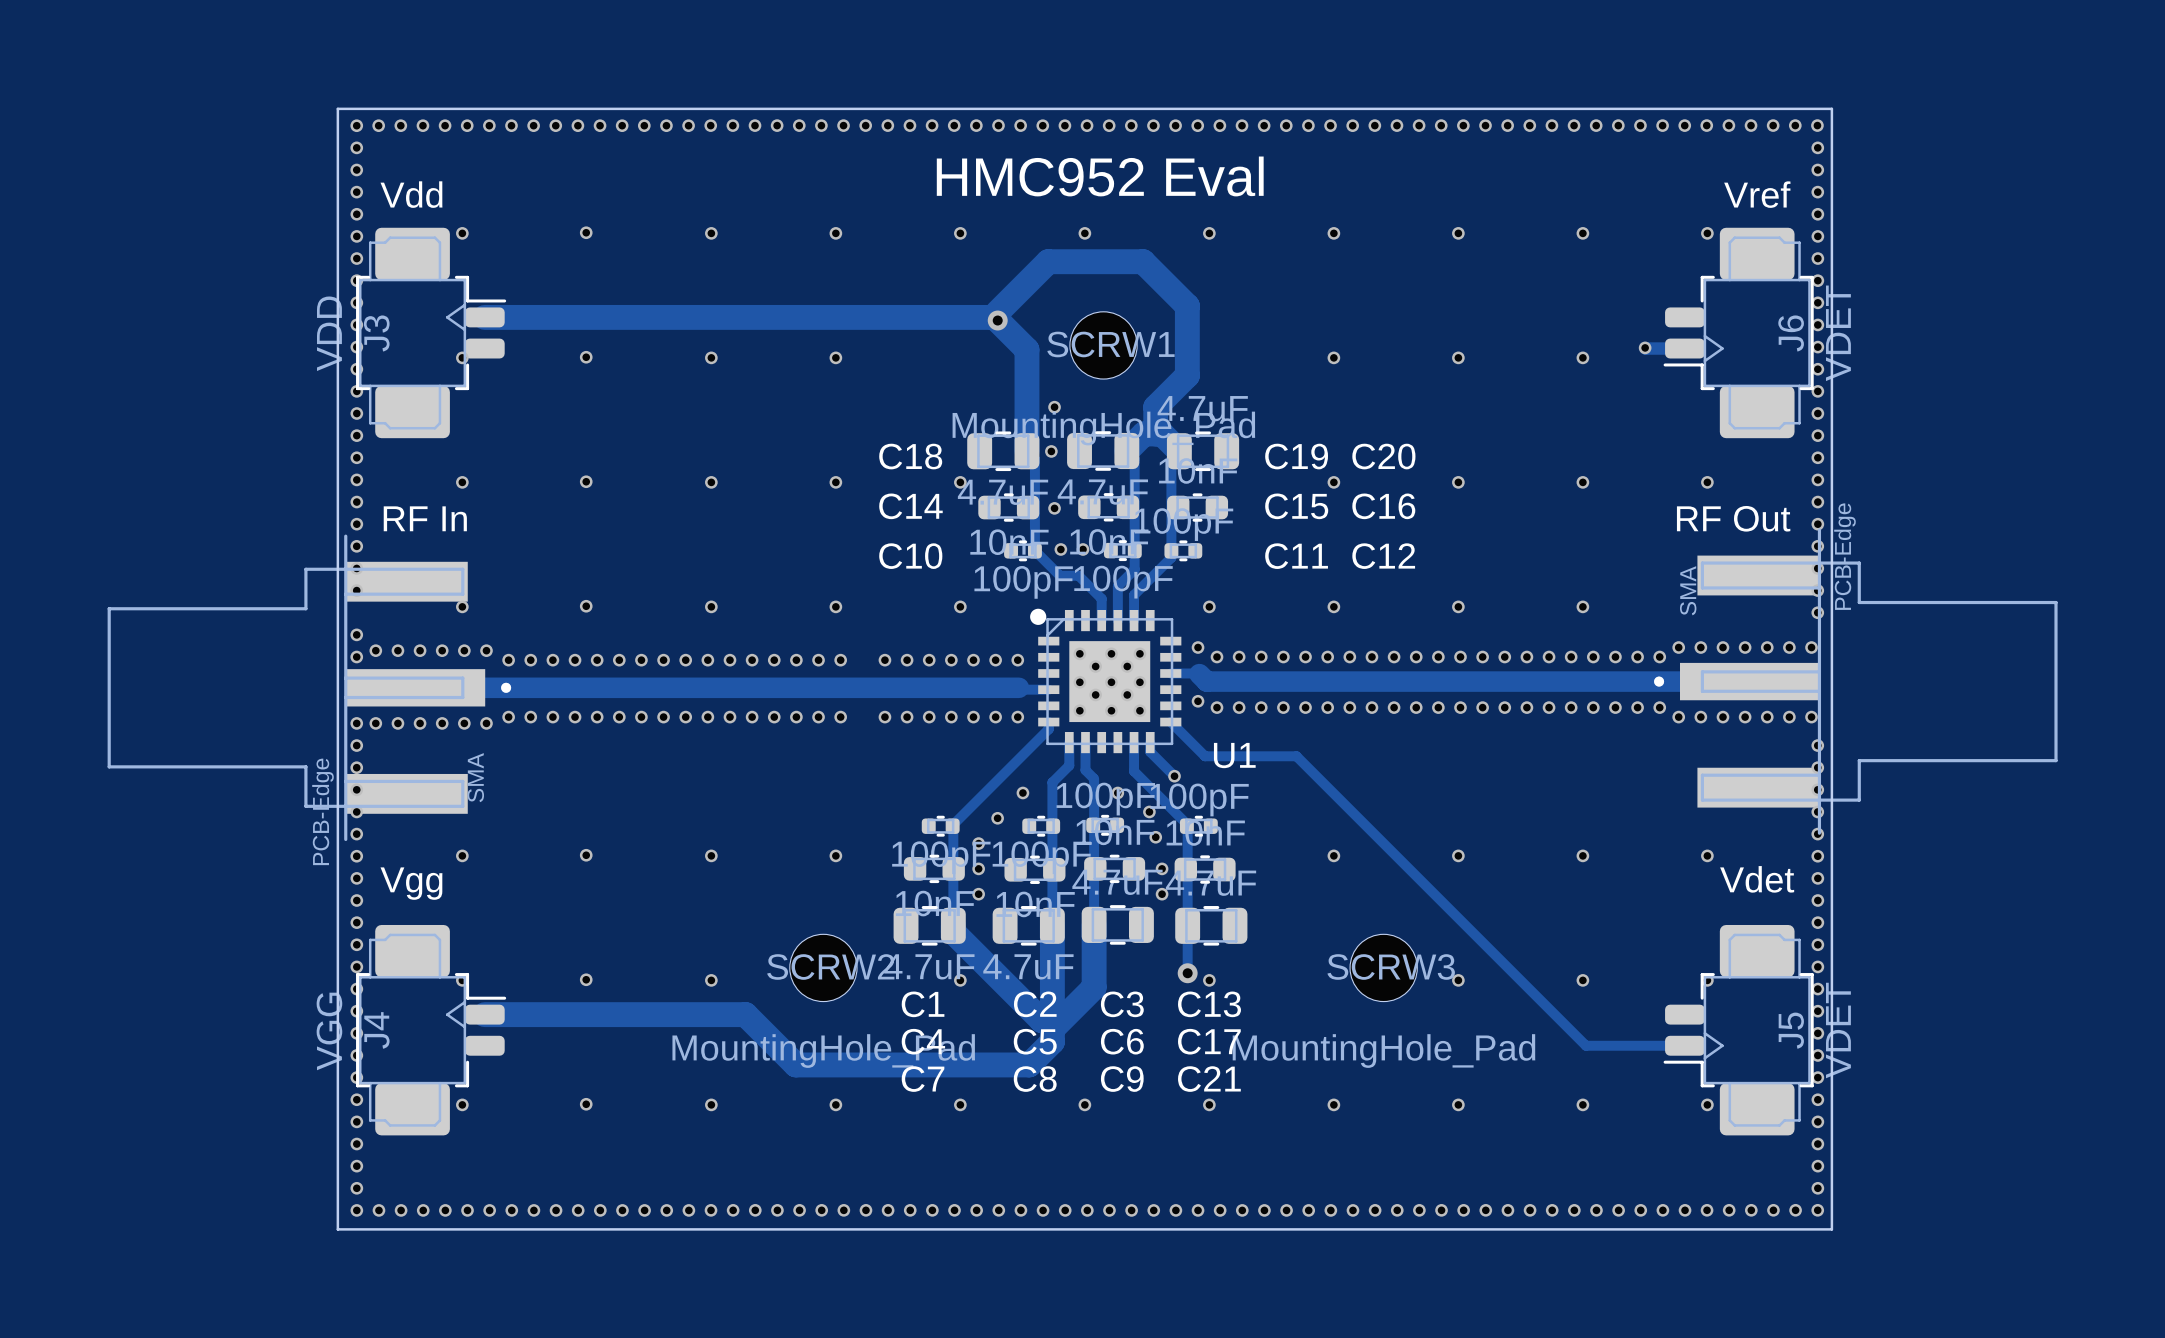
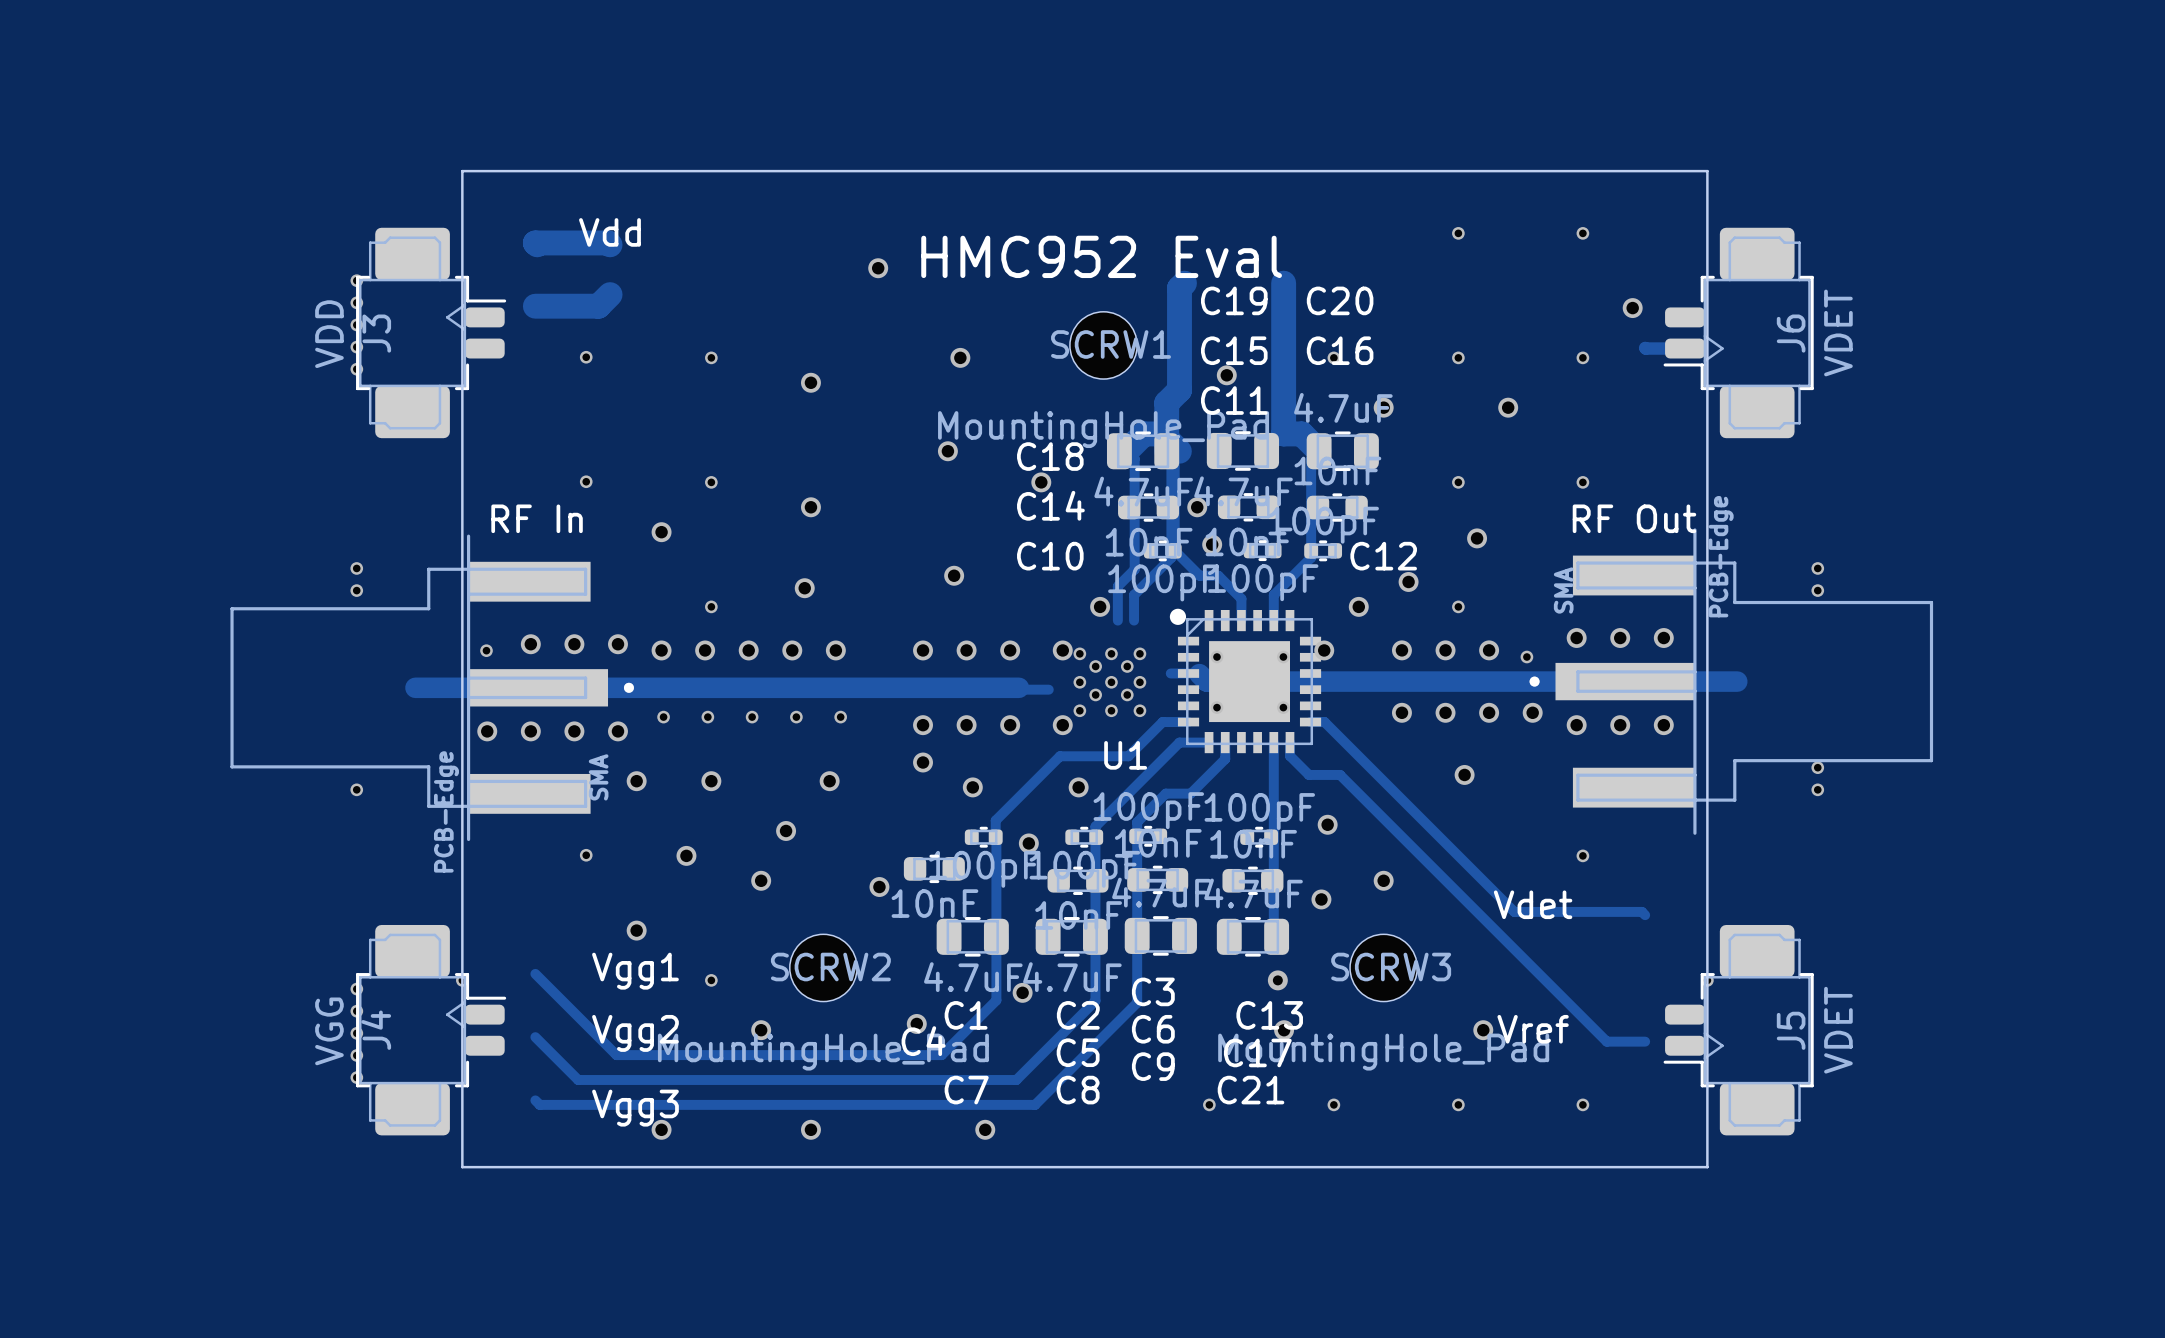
board edge: (337, 108) (1831, 108) (1831, 1229) (337, 1229) (337, 108) -> (462, 171) (462, 1167) (1707, 1167) (1707, 171) (462, 171)
via: (356, 125) -> none
via: (378, 125) -> none
via: (400, 125) -> none
via: (422, 125) -> none
via: (445, 125) -> none
via: (467, 125) -> none
via: (489, 125) -> none
via: (511, 125) -> none
via: (533, 125) -> none
via: (555, 125) -> none
via: (577, 125) -> none
via: (600, 125) -> none
via: (622, 125) -> none
via: (644, 125) -> none
via: (666, 125) -> none
via: (688, 125) -> none
via: (710, 125) -> none
via: (732, 125) -> none
via: (754, 125) -> none
via: (777, 125) -> none
via: (799, 125) -> none
via: (821, 125) -> none
via: (843, 125) -> none
via: (865, 125) -> none
via: (887, 125) -> none
via: (909, 125) -> none
via: (932, 125) -> none
via: (954, 125) -> none
via: (976, 125) -> none
via: (998, 125) -> none
via: (1020, 125) -> none
via: (1042, 125) -> none
via: (1064, 125) -> none
via: (1087, 125) -> none
via: (1109, 125) -> none
via: (1131, 125) -> none
via: (1153, 125) -> none
via: (1175, 125) -> none
via: (1197, 125) -> none
via: (1219, 125) -> none
via: (1242, 125) -> none
via: (1264, 125) -> none
via: (1286, 125) -> none
via: (1308, 125) -> none
via: (1330, 125) -> none
via: (1352, 125) -> none
via: (1374, 125) -> none
via: (1396, 125) -> none
via: (1419, 125) -> none
via: (1441, 125) -> none
via: (1463, 125) -> none
via: (1485, 125) -> none
via: (1507, 125) -> none
via: (1529, 125) -> none
via: (1551, 125) -> none
via: (1574, 125) -> none
via: (1596, 125) -> none
via: (1618, 125) -> none
via: (1640, 125) -> none
via: (1662, 125) -> none
via: (1684, 125) -> none
via: (1706, 125) -> none
via: (1728, 125) -> none
via: (1751, 125) -> none
via: (1773, 125) -> none
via: (1795, 125) -> none
via: (1817, 125) -> none
via: (356, 147) -> none
via: (1817, 147) -> none
via: (356, 169) -> none
via: (1817, 169) -> none
text position: HMC952 Eval (1100, 176) -> HMC952 Eval (1101, 256)
via: (356, 192) -> none
via: (1817, 192) -> none
text position: Vdd (411, 194) -> Vdd (609, 232)
text: Vref (1757, 194) -> none
via: (356, 214) -> none
via: (1817, 214) -> none
via: (586, 232) -> none
via: (462, 233) -> none
via: (711, 233) -> none
via: (835, 233) -> none
via: (960, 233) -> none
via: (1084, 233) -> none
via: (1209, 233) -> none
via: (1333, 233) -> none
via: (1707, 233) -> none
via: (356, 236) -> none
via: (1817, 236) -> none
track: none -> (537, 244) (535, 242) (608, 242) (610, 244)
via: (356, 258) -> none
via: (1817, 258) -> none
via: none -> (878, 268)
via: (1817, 280) -> none
track: none -> (1184, 283) (1179, 288) (1179, 390) (1166, 403) (1166, 451) (1174, 459) (1174, 550) (1199, 575) (1218, 575) (1241, 598) (1241, 620)
track: none -> (1283, 283) (1283, 433) (1301, 433) (1319, 451) (1311, 459) (1311, 557) (1273, 595) (1273, 620)
track: none -> (610, 294) (598, 306) (535, 306)
via: (1817, 302) -> none
via: none -> (1632, 308)
track: (997, 312) (1048, 261) (1143, 261) (1187, 305) (1187, 375) (1155, 407) (1155, 433) -> none
track: (484, 317) (997, 317) -> none
track: (997, 320) (1026, 349) (1026, 451) (1034, 459) (1034, 550) (1059, 575) (1078, 575) (1101, 598) (1101, 620) -> none
via: (997, 320) -> none
via: (1817, 324) -> none
via: (1645, 347) -> none
via: (1817, 347) -> none
via: (462, 357) -> none
via: (835, 357) -> none
via: none -> (960, 357)
via: (1817, 369) -> none
via: none -> (1226, 375)
via: none -> (810, 382)
via: (356, 391) -> none
via: (1817, 391) -> none
via: (1054, 407) -> none
via: none -> (1383, 407)
via: none -> (1508, 407)
via: (356, 413) -> none
via: (1817, 413) -> none
via: (356, 435) -> none
via: (1817, 435) -> none
via: none -> (947, 451)
C18 position: (1003, 451) -> (1143, 451)
via: (1051, 451) -> none
C19 position: (1103, 451) -> (1242, 451)
C20 position: (1203, 451) -> (1342, 451)
C19 name position: C19 (1296, 456) -> C19 (1234, 300)
C20 name position: C20 (1383, 456) -> C20 (1340, 300)
via: (356, 457) -> none
via: (1817, 457) -> none
via: (356, 479) -> none
via: (1817, 479) -> none
via: (462, 482) -> none
via: (835, 482) -> none
via: (960, 482) -> none
via: none -> (1041, 482)
via: (1333, 482) -> none
via: (1707, 482) -> none
via: (356, 502) -> none
via: (1817, 502) -> none
C15 name position: C15 (1296, 506) -> C15 (1234, 350)
C16 name position: C16 (1383, 506) -> C16 (1340, 350)
via: none -> (810, 507)
C14 position: (1008, 507) -> (1148, 507)
C15 position: (1108, 507) -> (1248, 507)
C16 position: (1197, 507) -> (1337, 507)
via: none -> (1197, 507)
via: (1054, 508) -> none
text position: RF In (425, 518) -> RF In (537, 518)
text position: RF Out (1733, 518) -> RF Out (1634, 518)
via: (356, 524) -> none
via: (1817, 524) -> none
via: none -> (661, 532)
via: none -> (1477, 538)
via: none -> (1212, 544)
via: (356, 546) -> none
via: (1817, 546) -> none
via: (1060, 549) -> none
via: (1083, 549) -> none
C10 position: (1022, 550) -> (1162, 550)
C11 position: (1122, 550) -> (1262, 550)
C12 position: (1183, 550) -> (1323, 550)
C11 name position: C11 (1296, 556) -> C11 (1234, 400)
via: none -> (954, 575)
via: none -> (1408, 581)
via: none -> (804, 588)
via: (462, 606) -> none
via: (586, 606) -> none
via: (835, 606) -> none
via: (960, 606) -> none
via: none -> (1100, 606)
via: (1209, 606) -> none
via: (1333, 606) -> none
via: none -> (1358, 606)
via: (1582, 606) -> none
via: (1817, 612) -> none
via: (356, 634) -> none
via: none -> (1576, 638)
via: none -> (1620, 638)
via: (1198, 647) -> none
via position: (1678, 647) -> (1663, 638)
via: (1700, 647) -> none
via: (1722, 647) -> none
via: (1745, 647) -> none
via: (1767, 647) -> none
via: (1789, 647) -> none
via: (1811, 647) -> none
via: (375, 650) -> none
via: (397, 650) -> none
via: (420, 650) -> none
via: (442, 650) -> none
via: (464, 650) -> none
via: none -> (923, 650)
via: none -> (966, 650)
via: none -> (1010, 650)
via: none -> (1062, 650)
via size: [1321, 650, 1335, 664] -> [1314, 640, 1335, 661]
via: none -> (1401, 650)
via: none -> (1445, 650)
via: none -> (1489, 650)
via size: [657, 653, 670, 667] -> [651, 640, 672, 661]
via size: [701, 653, 715, 667] -> [695, 640, 716, 661]
via size: [745, 653, 759, 667] -> [738, 640, 759, 661]
via size: [790, 653, 803, 667] -> [782, 640, 803, 661]
via size: [834, 653, 847, 667] -> [825, 640, 846, 661]
via: (356, 657) -> none
via: (1239, 657) -> none
via: (1261, 657) -> none
via: (1305, 657) -> none
via: (1349, 657) -> none
via: (1371, 657) -> none
via: (1394, 657) -> none
via: (1416, 657) -> none
via: (1438, 657) -> none
via: (1460, 657) -> none
via: (1482, 657) -> none
via: (1504, 657) -> none
via: (1549, 657) -> none
via: (1571, 657) -> none
via: (1593, 657) -> none
via: (1615, 657) -> none
via: (1637, 657) -> none
via: (1659, 657) -> none
via: (508, 660) -> none
via position: (530, 660) -> (530, 644)
via: (552, 660) -> none
via position: (575, 660) -> (574, 644)
via: (597, 660) -> none
via position: (619, 660) -> (617, 644)
via: (641, 660) -> none
via: (685, 660) -> none
via: (729, 660) -> none
via: (774, 660) -> none
via: (818, 660) -> none
via: (884, 660) -> none
via: (907, 660) -> none
via: (929, 660) -> none
via: (951, 660) -> none
via: (973, 660) -> none
via: (995, 660) -> none
via: (1017, 660) -> none
U1 position: (1105, 680) -> (1245, 680)
part position: (1855, 681) -> (1731, 681)
part position: (309, 687) -> (432, 687)
via: (1198, 701) -> none
via size: [1520, 701, 1534, 714] -> [1522, 702, 1543, 723]
via: (1239, 707) -> none
via: (1261, 707) -> none
via: (1305, 707) -> none
via: (1327, 707) -> none
via: (1349, 707) -> none
via: (1371, 707) -> none
via: (1394, 707) -> none
via: (1416, 707) -> none
via: (1438, 707) -> none
via: (1460, 707) -> none
via: (1482, 707) -> none
via: (1504, 707) -> none
via: (1549, 707) -> none
via: (1571, 707) -> none
via: (1593, 707) -> none
via: (1615, 707) -> none
via: (1637, 707) -> none
via: (1659, 707) -> none
via size: [524, 710, 538, 724] -> [520, 721, 541, 742]
via size: [568, 710, 582, 724] -> [564, 721, 585, 742]
via size: [612, 710, 626, 724] -> [608, 721, 628, 742]
via: none -> (1401, 712)
via: none -> (1445, 712)
via: none -> (1489, 712)
via size: [480, 717, 493, 730] -> [477, 721, 498, 742]
via: (508, 717) -> none
via: (552, 717) -> none
via: (597, 717) -> none
via: (641, 717) -> none
via: (685, 717) -> none
via: (729, 717) -> none
via: (774, 717) -> none
via: (818, 717) -> none
via: (884, 717) -> none
via: (907, 717) -> none
via: (929, 717) -> none
via: (951, 717) -> none
via: (973, 717) -> none
via: (995, 717) -> none
via: (1017, 717) -> none
via position: (1678, 717) -> (1663, 725)
via: (1700, 717) -> none
via: (1722, 717) -> none
via: (1745, 717) -> none
via: (1767, 717) -> none
via: (1789, 717) -> none
via: (1811, 717) -> none
track: (1048, 722) (1048, 729) (953, 824) (953, 932) (1041, 1020) (1054, 1020) -> none
track: (1170, 722) (1205, 756) (1296, 756) (1586, 1045) (1684, 1045) -> none
track: none -> (1188, 722) (1162, 722) (1128, 756) (1059, 756) (995, 820) (996, 1000) (941, 1055) (616, 1055) (535, 973)
track: none -> (1310, 722) (1324, 722) (1514, 911) (1641, 911) (1645, 915)
via: (356, 723) -> none
via: (375, 723) -> none
via: (397, 723) -> none
via: (420, 723) -> none
via: (442, 723) -> none
via: (464, 723) -> none
via: none -> (923, 725)
via: none -> (966, 725)
via: none -> (1010, 725)
via: none -> (1062, 725)
via: none -> (1576, 725)
via: none -> (1620, 725)
track: (1069, 742) (1069, 765) (1052, 782) (1052, 1041) (1029, 1064) (795, 1064) (745, 1014) (484, 1014) -> none
track: (1085, 742) (1085, 770) (1092, 777) -> none
track: (1134, 742) (1134, 771) (1187, 824) (1187, 973) -> none
track: (1150, 742) (1150, 751) (1174, 776) -> none
track: none -> (1209, 742) (1179, 742) (1095, 826) (1095, 1000) (1016, 1079) (578, 1079) (535, 1037)
track: none -> (1225, 742) (1225, 759) (1190, 793) (1165, 793) (1137, 822) (1137, 1002) (1035, 1104) (539, 1104) (535, 1100)
track: none -> (1273, 742) (1273, 932) (1278, 936)
track: none -> (1289, 742) (1289, 755) (1308, 774) (1340, 774) (1606, 1041) (1645, 1041)
via: (356, 745) -> none
via: (1817, 745) -> none
U1 name position: U1 (1234, 755) -> U1 (1125, 755)
via: none -> (923, 762)
via: (356, 767) -> none
via: none -> (1464, 774)
via: (1174, 776) -> none
track: (1094, 778) (1094, 987) (1054, 1027) -> none
via: none -> (636, 781)
via: none -> (711, 781)
via: none -> (829, 781)
via: none -> (972, 787)
via: none -> (1078, 787)
via: (1022, 792) -> none
via: (1117, 792) -> none
via: (356, 811) -> none
via: (1149, 811) -> none
via: (1817, 811) -> none
via: (997, 818) -> none
via: none -> (1327, 824)
C3 position: (1105, 825) -> (1148, 836)
C1 position: (940, 826) -> (983, 837)
C2 position: (1041, 826) -> (1084, 837)
C13 position: (1198, 826) -> (1259, 837)
via: none -> (786, 830)
via: (356, 834) -> none
via: (1817, 834) -> none
via: (1155, 837) -> none
via: (978, 843) -> none
via: none -> (1028, 843)
via: (462, 855) -> none
via: none -> (686, 855)
via: (711, 855) -> none
via: (835, 855) -> none
via: (1333, 855) -> none
via: (1458, 855) -> none
via: (1707, 855) -> none
via: (356, 856) -> none
via: (1817, 856) -> none
via: (978, 868) -> none
C6 position: (1114, 868) -> (1157, 879)
via: (1162, 868) -> none
C5 position: (1034, 869) -> (1078, 880)
C17 position: (1205, 869) -> (1252, 880)
via: (356, 878) -> none
via: (1817, 878) -> none
text position: Vdet (1757, 879) -> Vdet (1533, 904)
via: none -> (761, 880)
via: none -> (1383, 880)
text: Vgg (411, 883) -> none
via: none -> (879, 887)
via: (978, 894) -> none
via: (1162, 894) -> none
via: none -> (1321, 899)
via: (356, 900) -> none
via: (1817, 900) -> none
via: (356, 922) -> none
via: (1817, 922) -> none
C9 position: (1117, 924) -> (1160, 935)
C7 position: (929, 925) -> (972, 936)
C8 position: (1028, 925) -> (1071, 936)
C21 position: (1211, 925) -> (1252, 936)
via: none -> (636, 930)
via: (356, 944) -> none
via: (1817, 944) -> none
via: (356, 966) -> none
via: (1817, 966) -> none
text: none -> Vgg1 (635, 971)
via position: (1187, 973) -> (1277, 980)
via: (586, 979) -> none
via: (960, 980) -> none
via: (1209, 980) -> none
via: (1458, 980) -> none
via: (1582, 980) -> none
via: (1817, 989) -> none
via: none -> (1022, 992)
C3 name position: C3 (1122, 1004) -> C3 (1153, 991)
via: (1817, 1011) -> none
via: none -> (916, 1023)
text: none -> Vref (1533, 1029)
via: none -> (761, 1030)
via: none -> (1284, 1030)
via: none -> (1483, 1030)
text: none -> Vgg2 (635, 1033)
via: (1817, 1033) -> none
C6 name position: C6 (1122, 1041) -> C6 (1153, 1029)
via: (1817, 1055) -> none
via: (1817, 1077) -> none
C9 name position: C9 (1122, 1079) -> C9 (1153, 1066)
via: (356, 1099) -> none
via: (1817, 1099) -> none
via: (462, 1104) -> none
via: (586, 1104) -> none
via: (711, 1104) -> none
via: (835, 1104) -> none
via: (960, 1104) -> none
via: (1084, 1104) -> none
via: (1707, 1104) -> none
text: none -> Vgg3 (635, 1108)
via: (356, 1121) -> none
via: (1817, 1121) -> none
via: none -> (661, 1129)
via: none -> (810, 1129)
via: none -> (985, 1129)
via: (356, 1144) -> none
via: (1817, 1144) -> none
via: (356, 1166) -> none
via: (1817, 1166) -> none
via: (356, 1188) -> none
via: (1817, 1188) -> none
via: (356, 1210) -> none
via: (378, 1210) -> none
via: (401, 1210) -> none
via: (423, 1210) -> none
via: (445, 1210) -> none
via: (467, 1210) -> none
via: (489, 1210) -> none
via: (511, 1210) -> none
via: (533, 1210) -> none
via: (556, 1210) -> none
via: (578, 1210) -> none
via: (600, 1210) -> none
via: (622, 1210) -> none
via: (644, 1210) -> none
via: (666, 1210) -> none
via: (688, 1210) -> none
via: (711, 1210) -> none
via: (733, 1210) -> none
via: (755, 1210) -> none
via: (777, 1210) -> none
via: (799, 1210) -> none
via: (821, 1210) -> none
via: (843, 1210) -> none
via: (865, 1210) -> none
via: (888, 1210) -> none
via: (910, 1210) -> none
via: (932, 1210) -> none
via: (954, 1210) -> none
via: (976, 1210) -> none
via: (998, 1210) -> none
via: (1020, 1210) -> none
via: (1043, 1210) -> none
via: (1065, 1210) -> none
via: (1087, 1210) -> none
via: (1109, 1210) -> none
via: (1131, 1210) -> none
via: (1153, 1210) -> none
via: (1175, 1210) -> none
via: (1198, 1210) -> none
via: (1220, 1210) -> none
via: (1242, 1210) -> none
via: (1264, 1210) -> none
via: (1286, 1210) -> none
via: (1308, 1210) -> none
via: (1330, 1210) -> none
via: (1352, 1210) -> none
via: (1375, 1210) -> none
via: (1397, 1210) -> none
via: (1419, 1210) -> none
via: (1441, 1210) -> none
via: (1463, 1210) -> none
via: (1485, 1210) -> none
via: (1507, 1210) -> none
via: (1530, 1210) -> none
via: (1552, 1210) -> none
via: (1574, 1210) -> none
via: (1596, 1210) -> none
via: (1618, 1210) -> none
via: (1640, 1210) -> none
via: (1662, 1210) -> none
via: (1685, 1210) -> none
via: (1707, 1210) -> none
via: (1729, 1210) -> none
via: (1751, 1210) -> none
via: (1773, 1210) -> none
via: (1795, 1210) -> none
via: (1817, 1210) -> none

